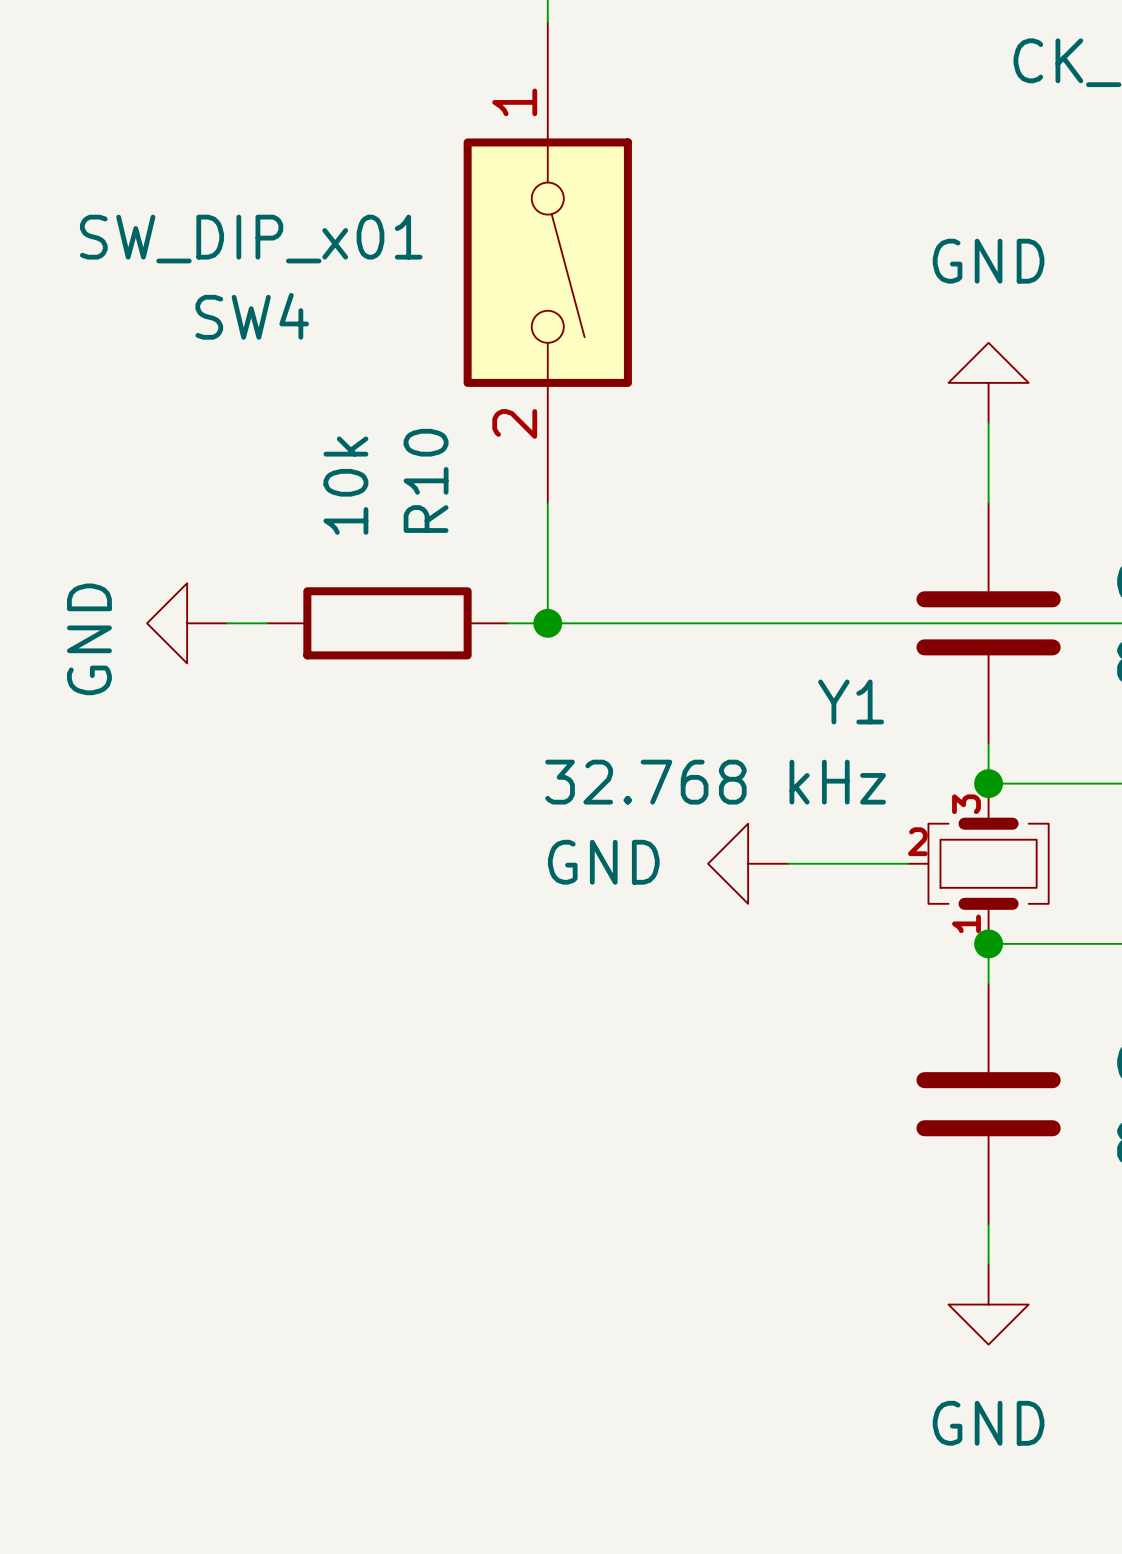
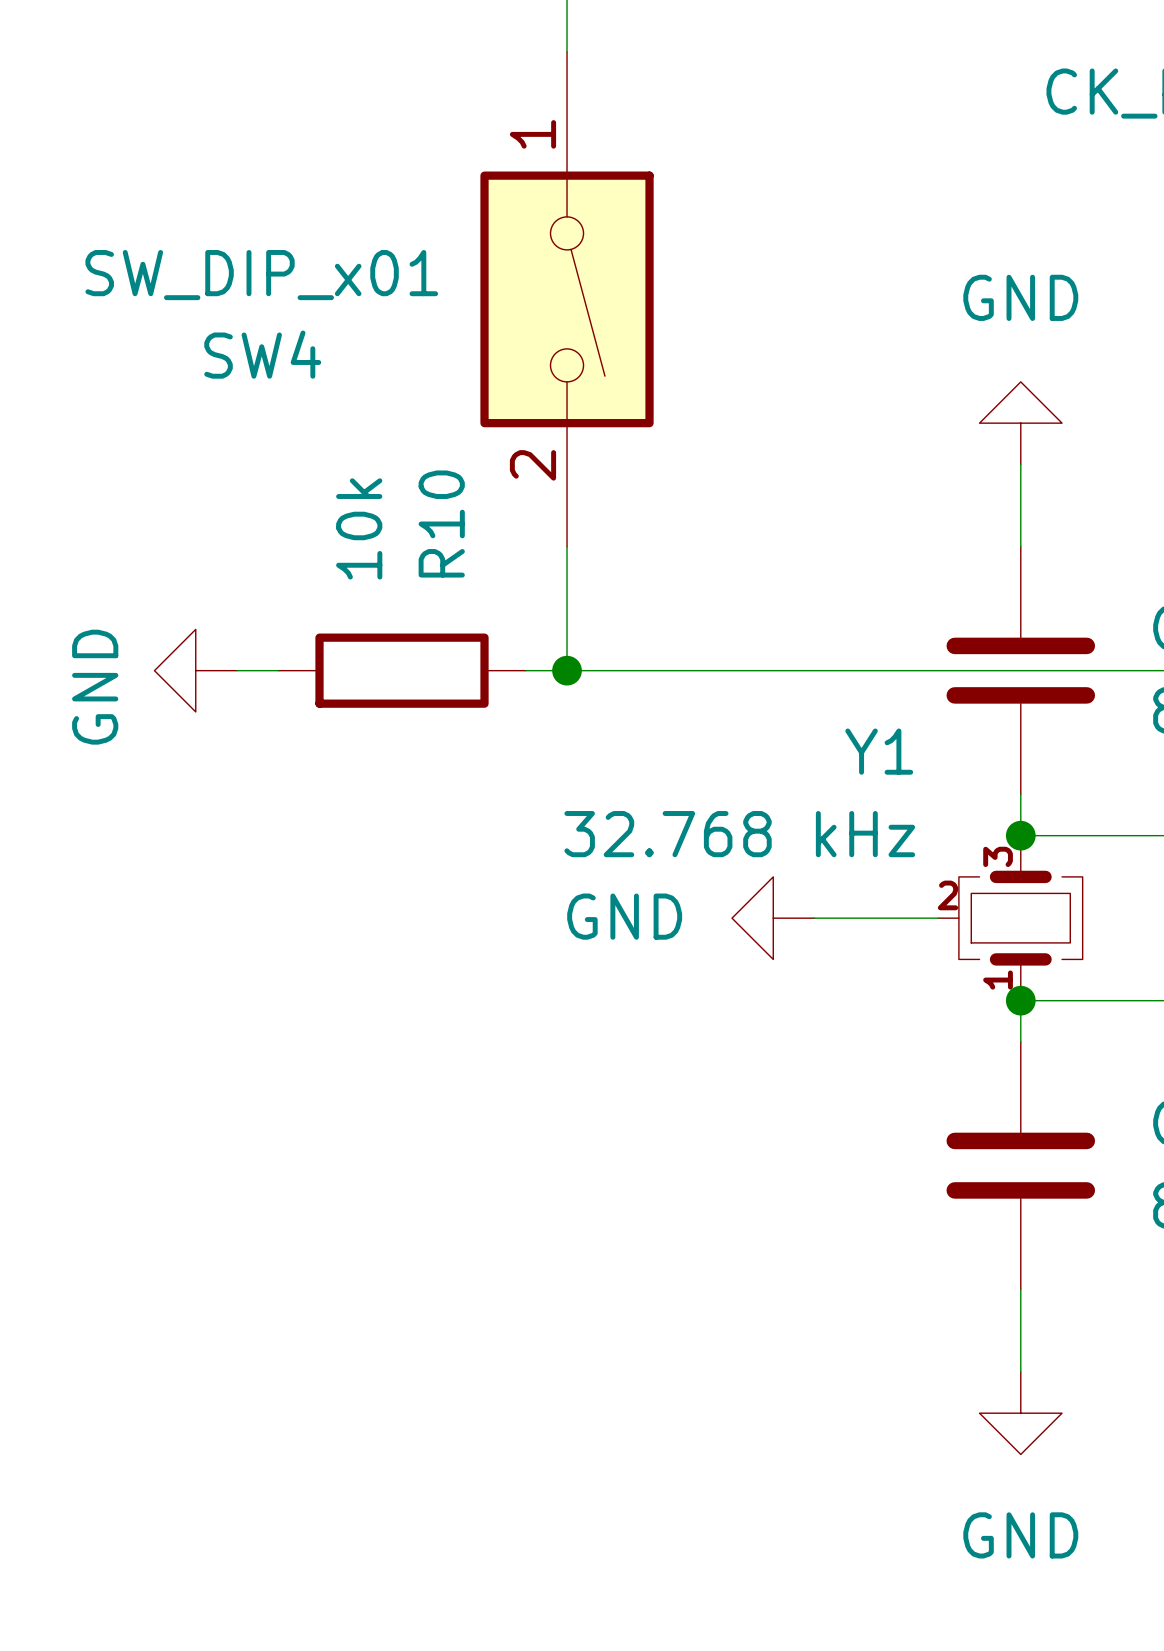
power symbol position: GND (988, 1304) -> GND (1020, 1413)

